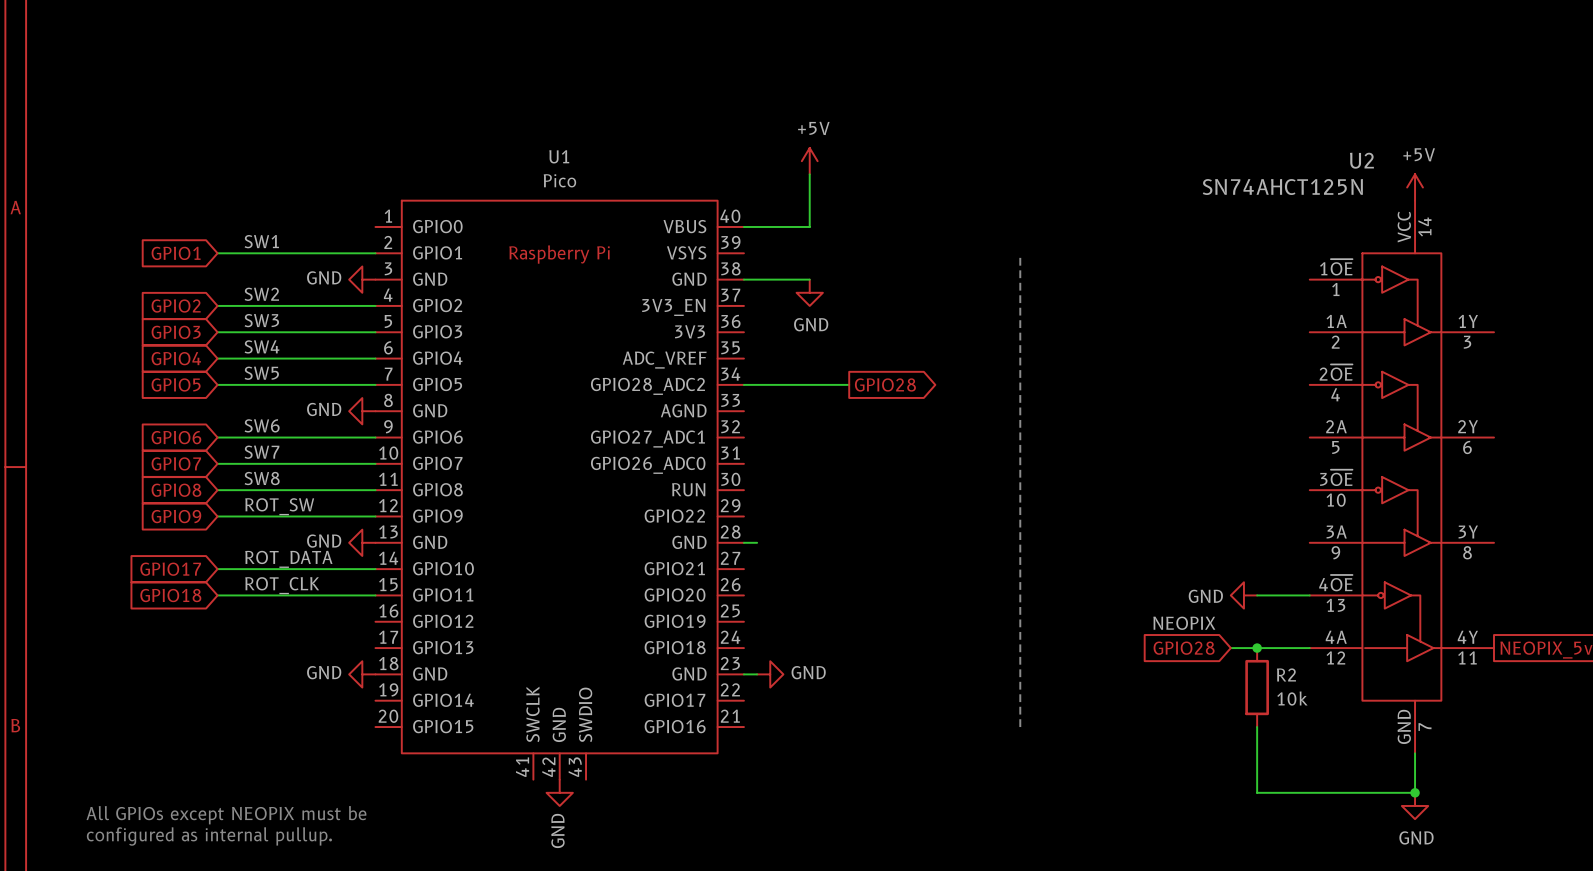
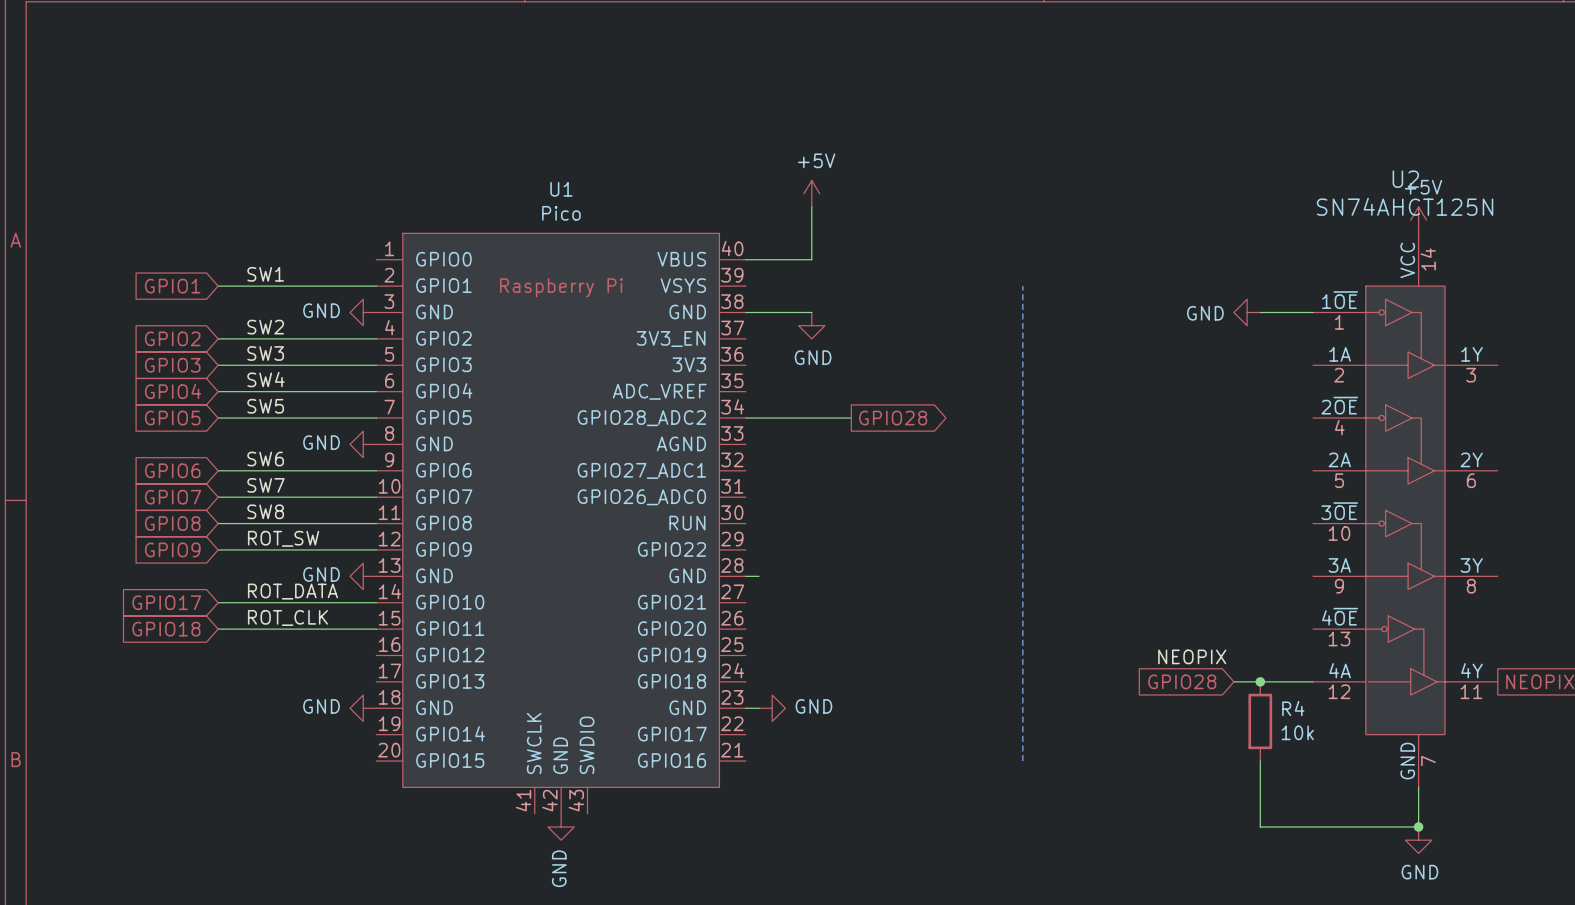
U2 name position: U2 (1361, 160) -> U2 (1405, 179)
U2 value position: SN74AHCT125N (1282, 187) -> SN74AHCT125N (1405, 206)
power symbol: none -> GND (1247, 312)
wire: none -> (1260, 312) (1313, 312)
power symbol: GND (1243, 595) -> none
wire: (1257, 595) (1309, 595) -> none
R2 name: R2 (1286, 674) -> R4 (1293, 708)
text: All GPIOs except NEOPIX must be (226, 815) -> none
text: configured as internal pullup. (209, 836) -> none

